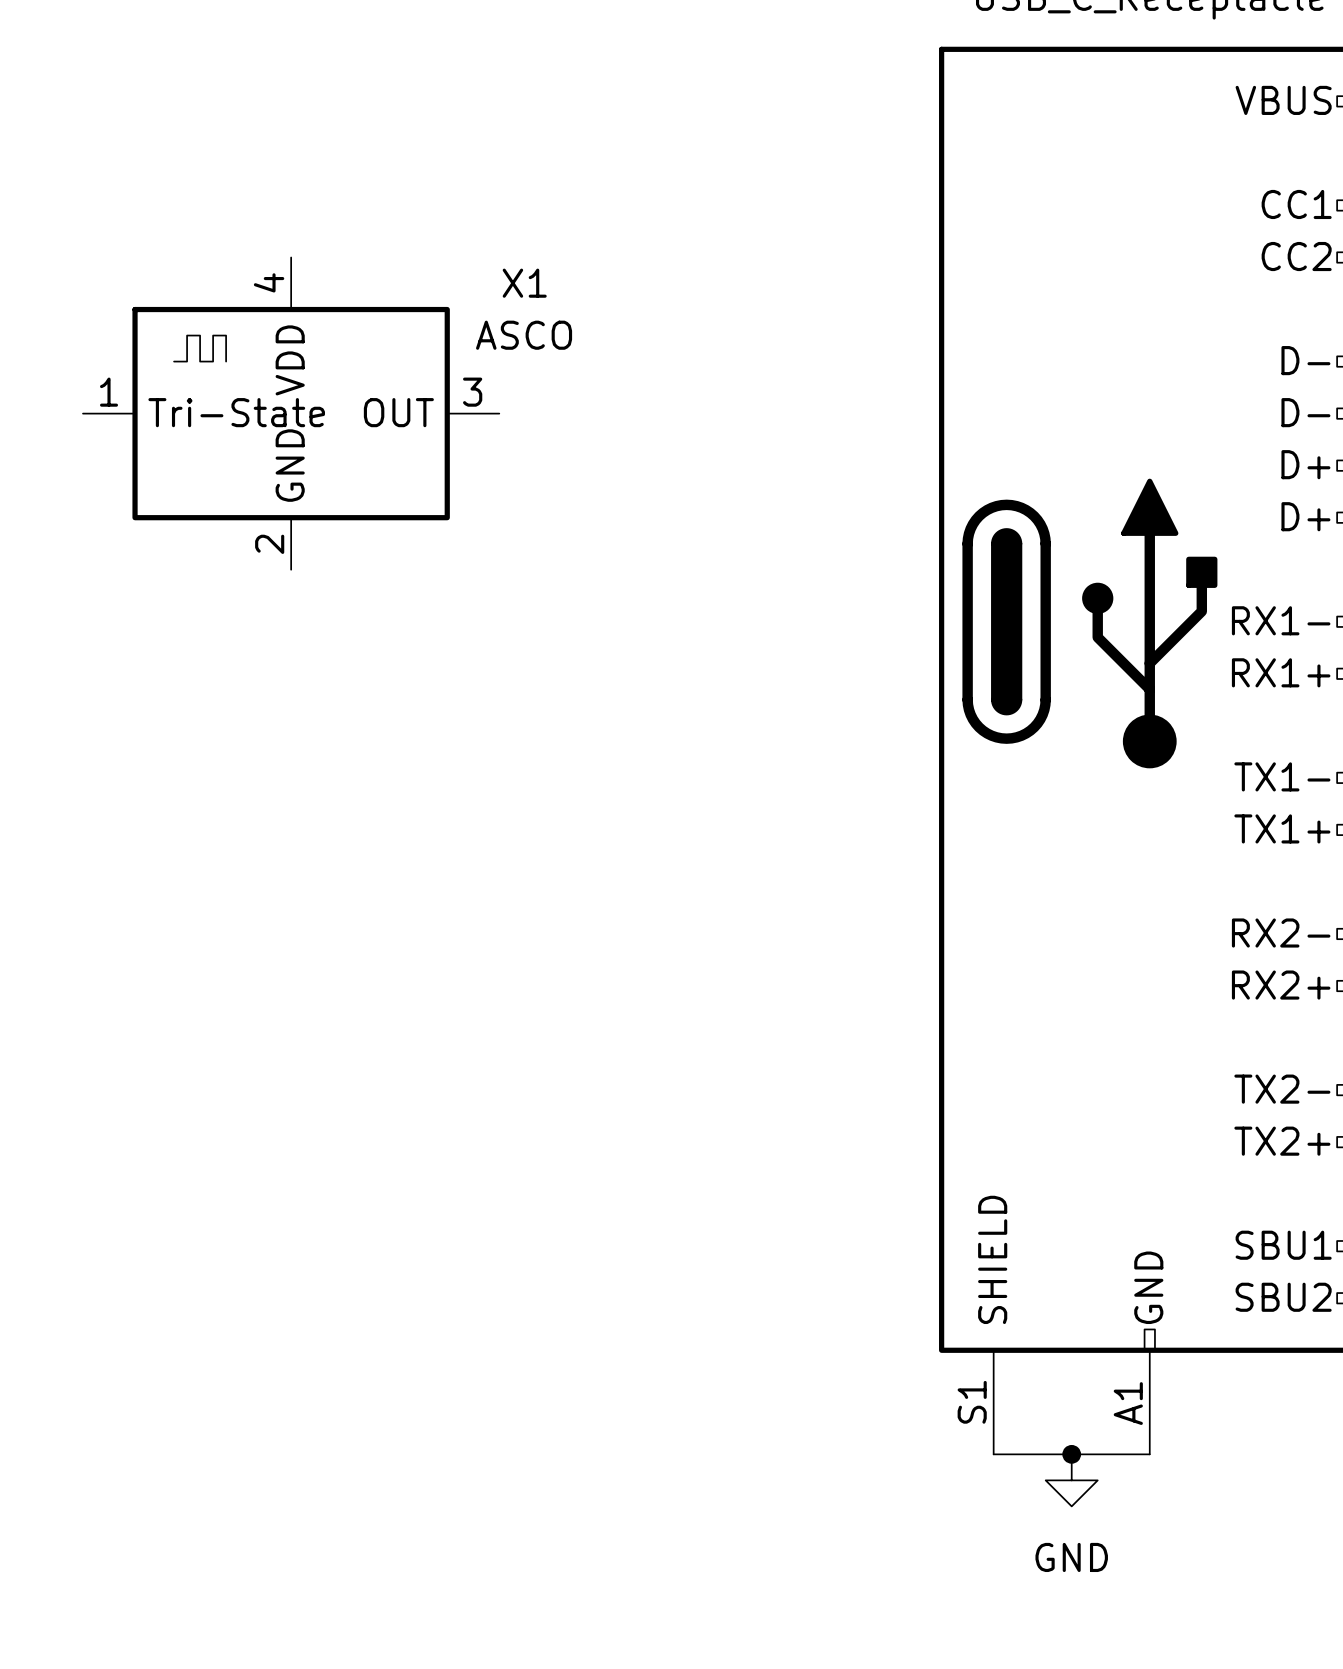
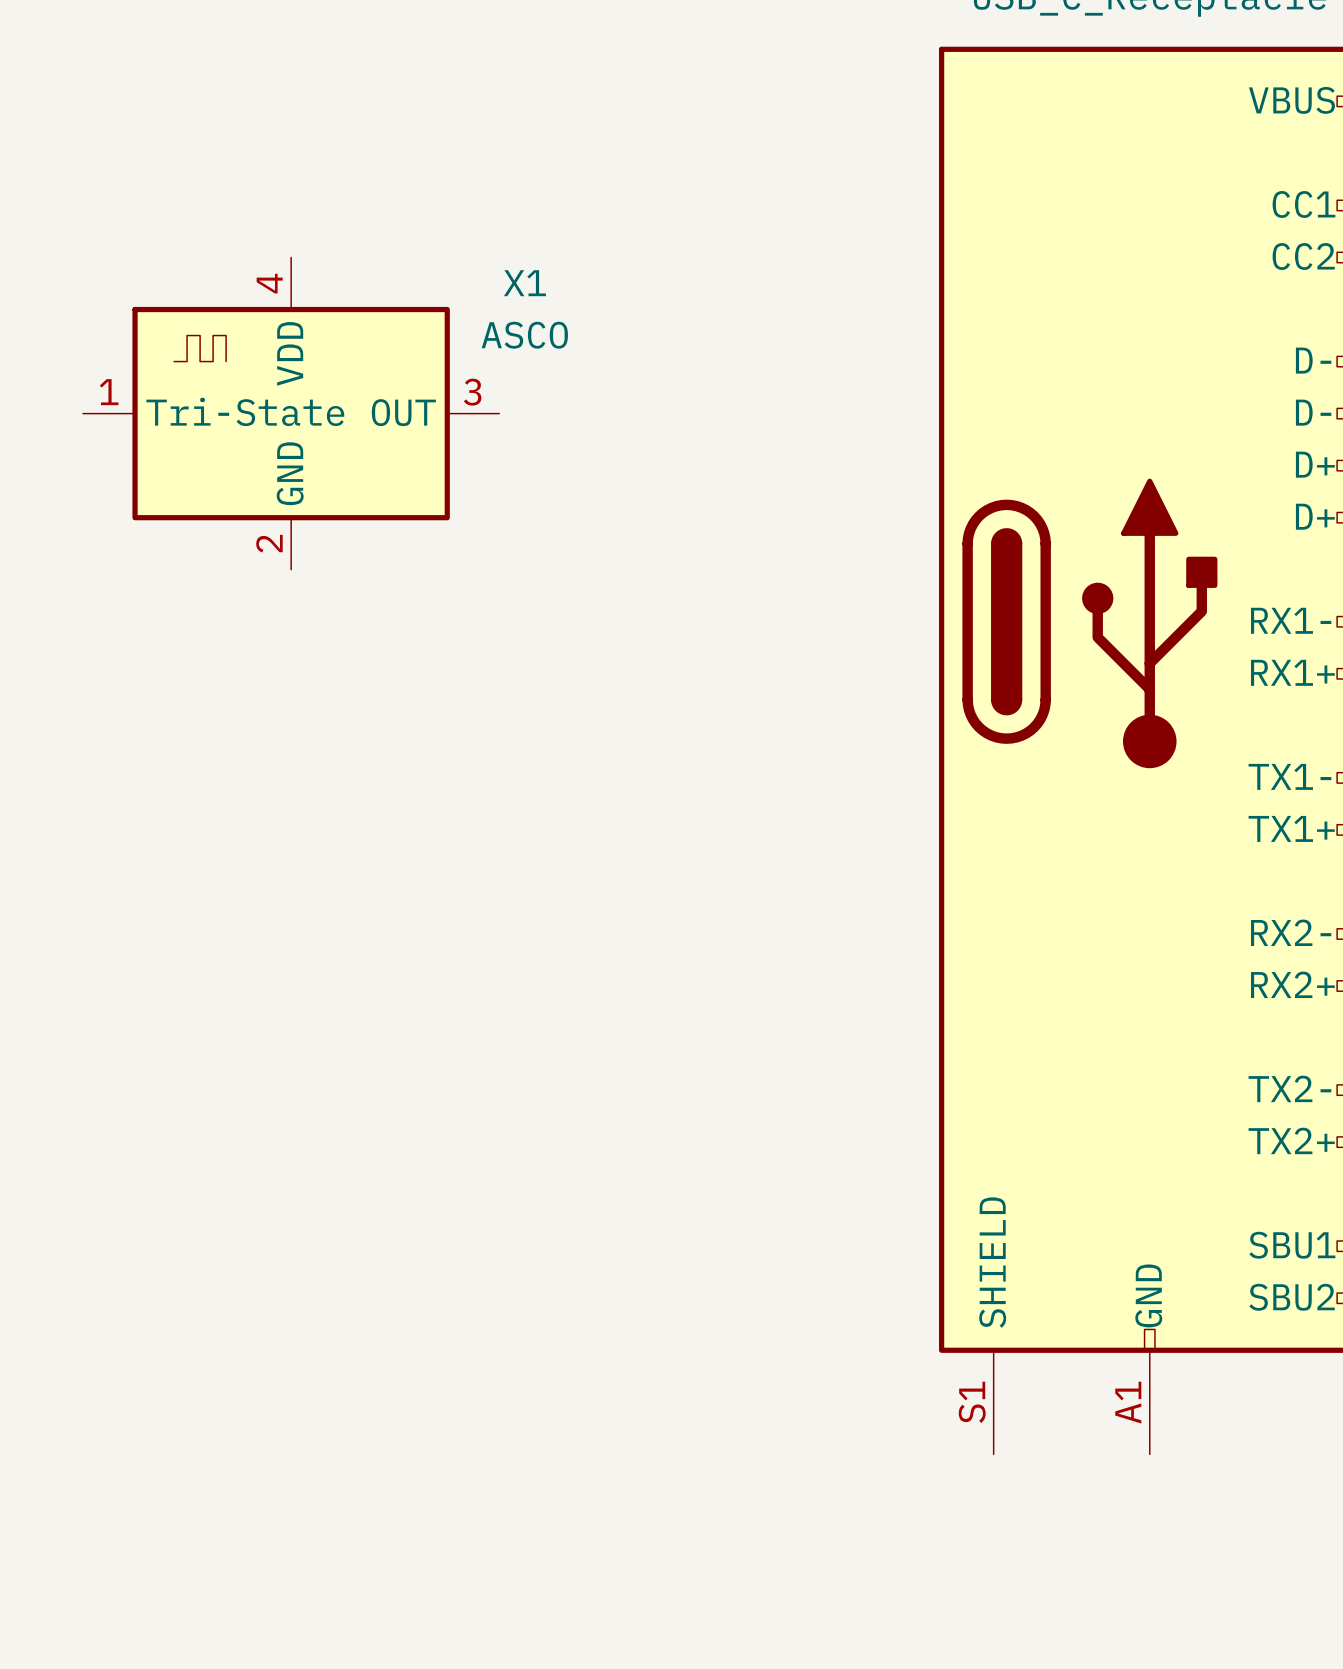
wire: (993, 1454) (1149, 1454) -> none
junction: (1071, 1454) -> none
power symbol: GND (1071, 1480) -> none

